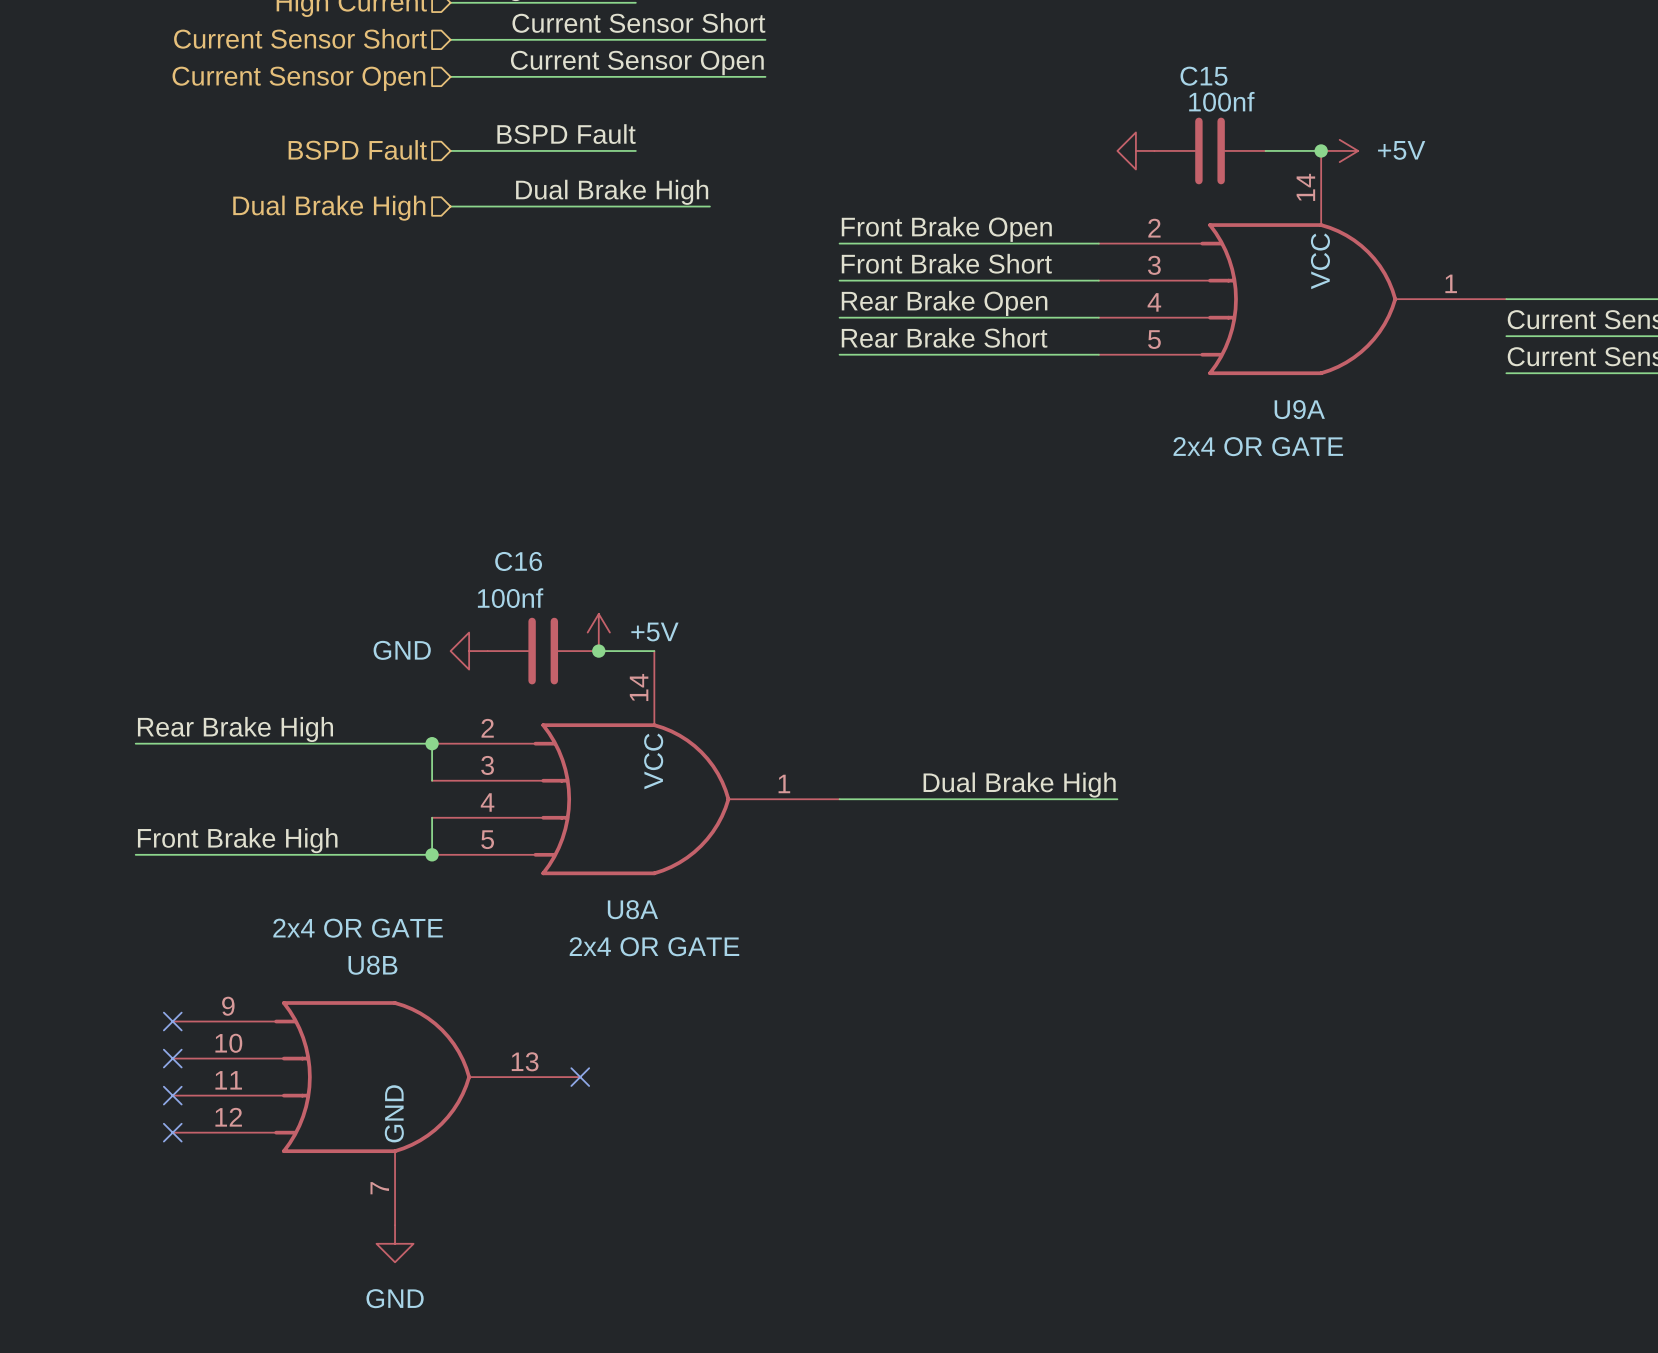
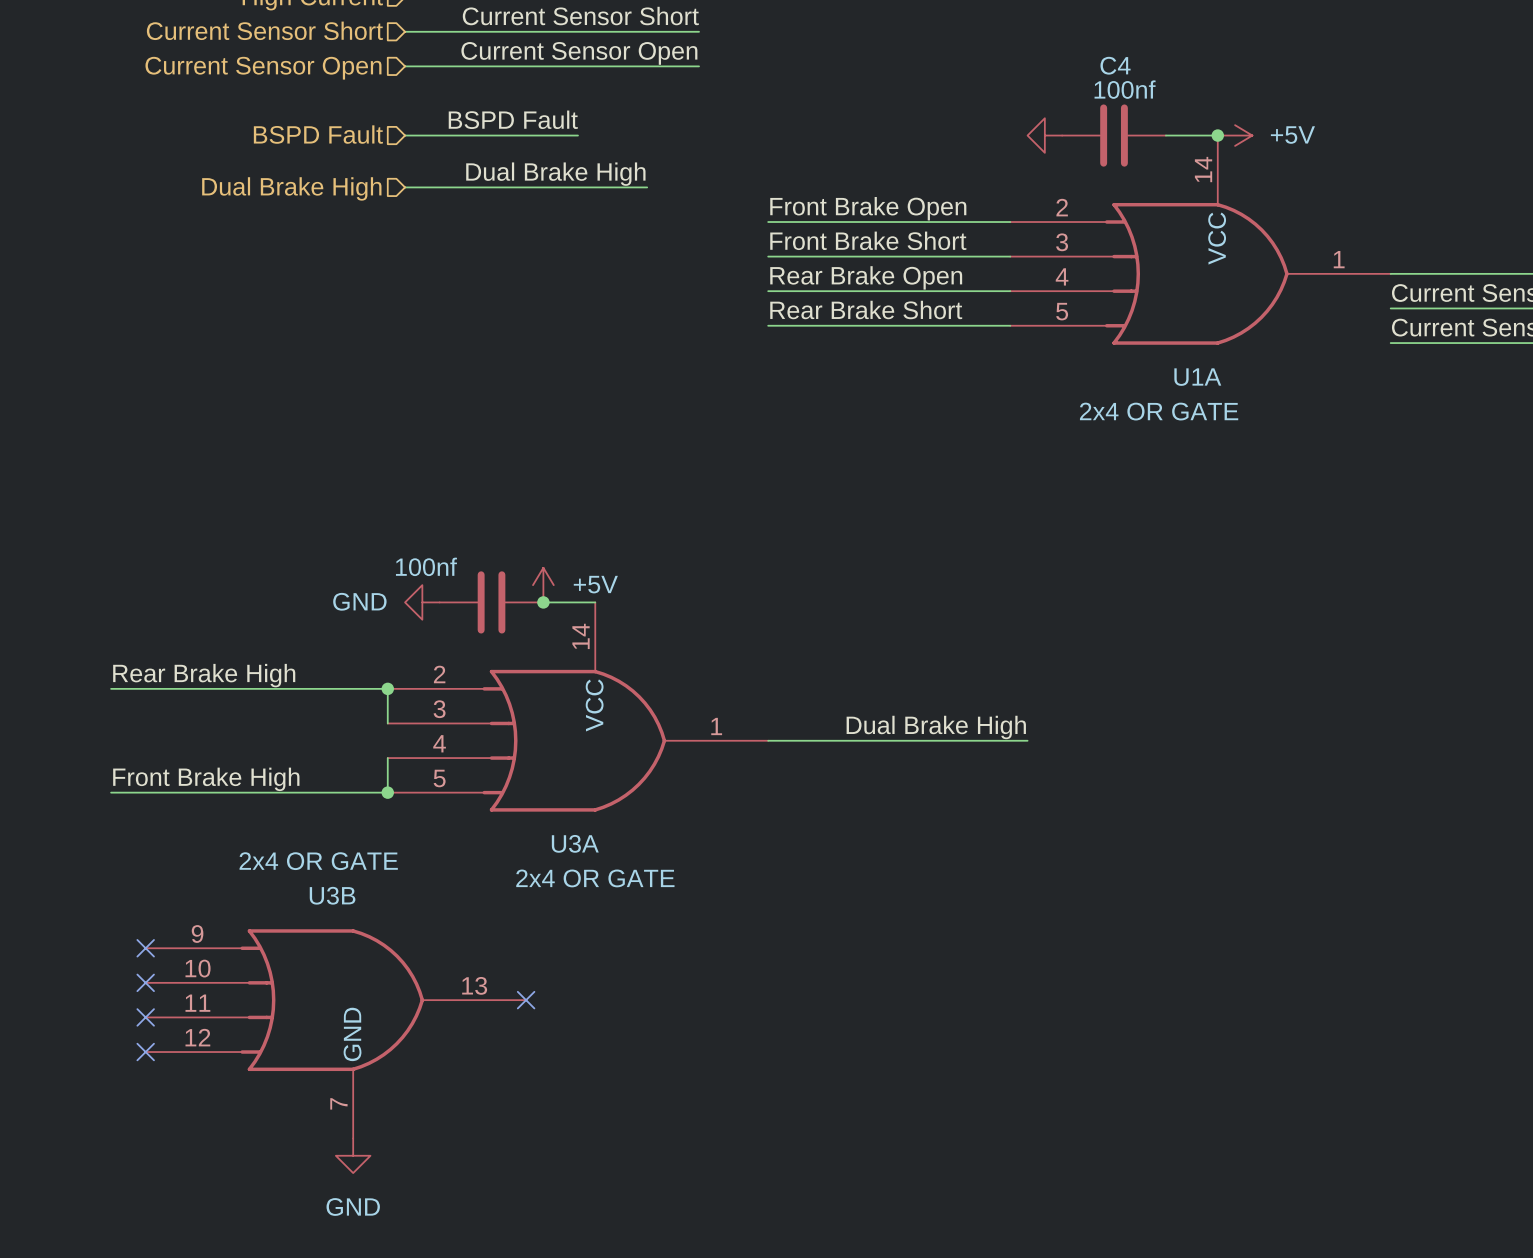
C15 name: C15 (1203, 76) -> C4 (1115, 65)
U9A name: U9A (1299, 409) -> U1A (1197, 377)
C16 name: C16 (518, 561) -> none
C16 value position: 100nf (510, 598) -> 100nf (426, 566)
U8A name: U8A (632, 909) -> U3A (575, 843)
U8B name: U8B (372, 965) -> U3B (332, 895)

